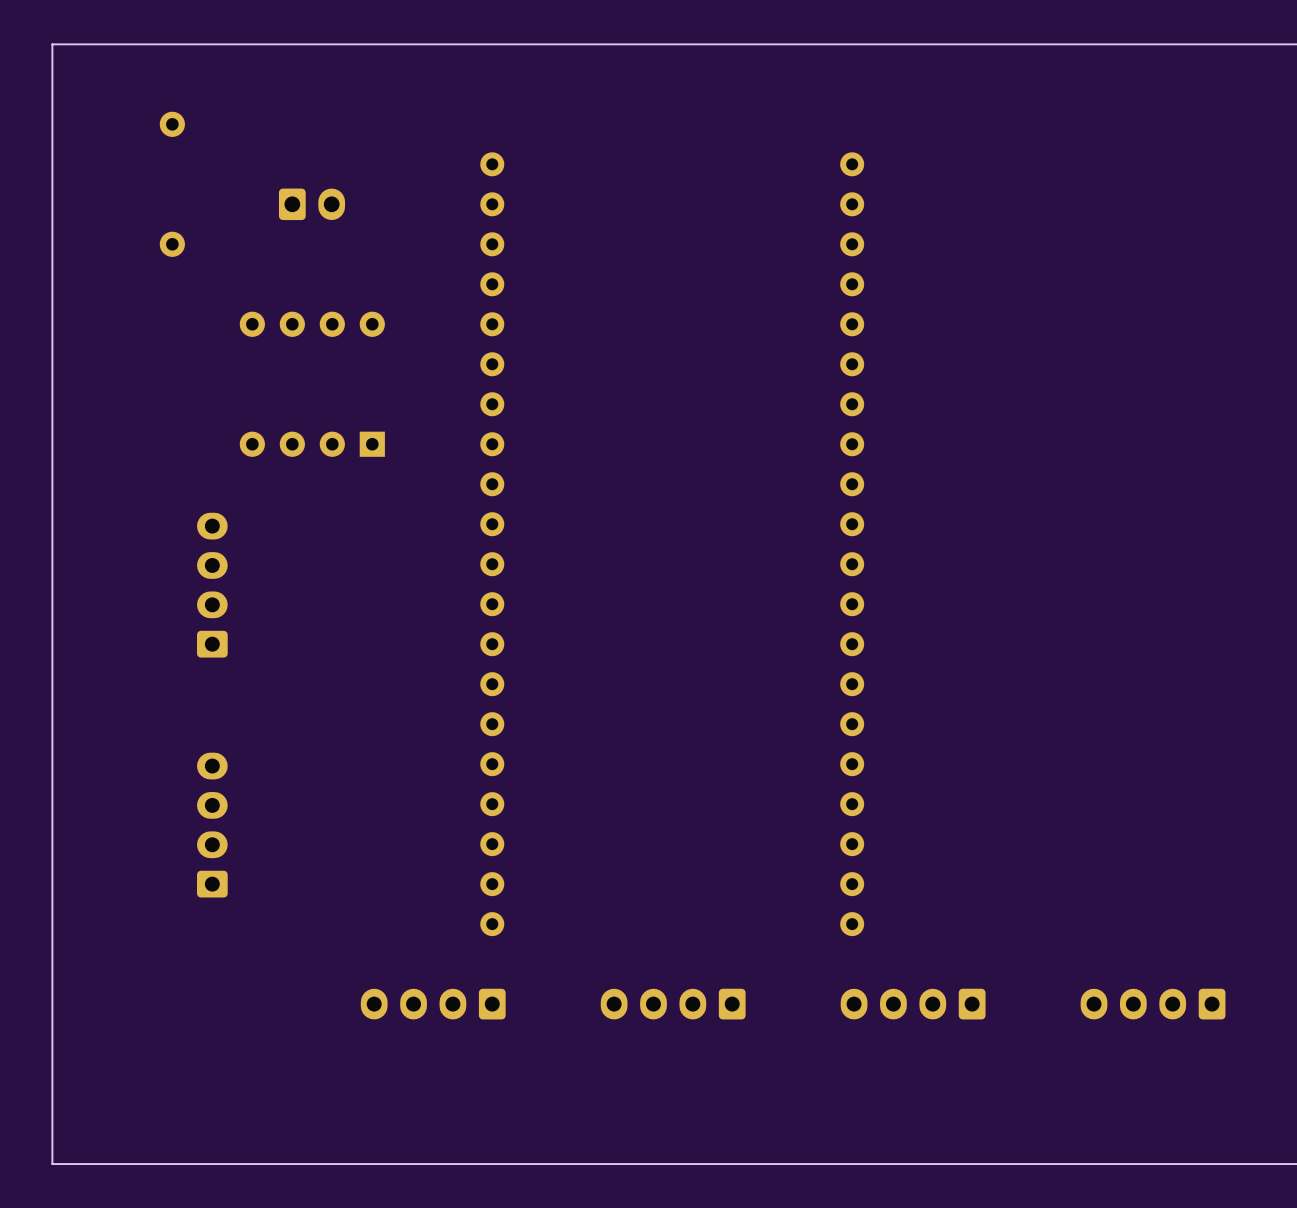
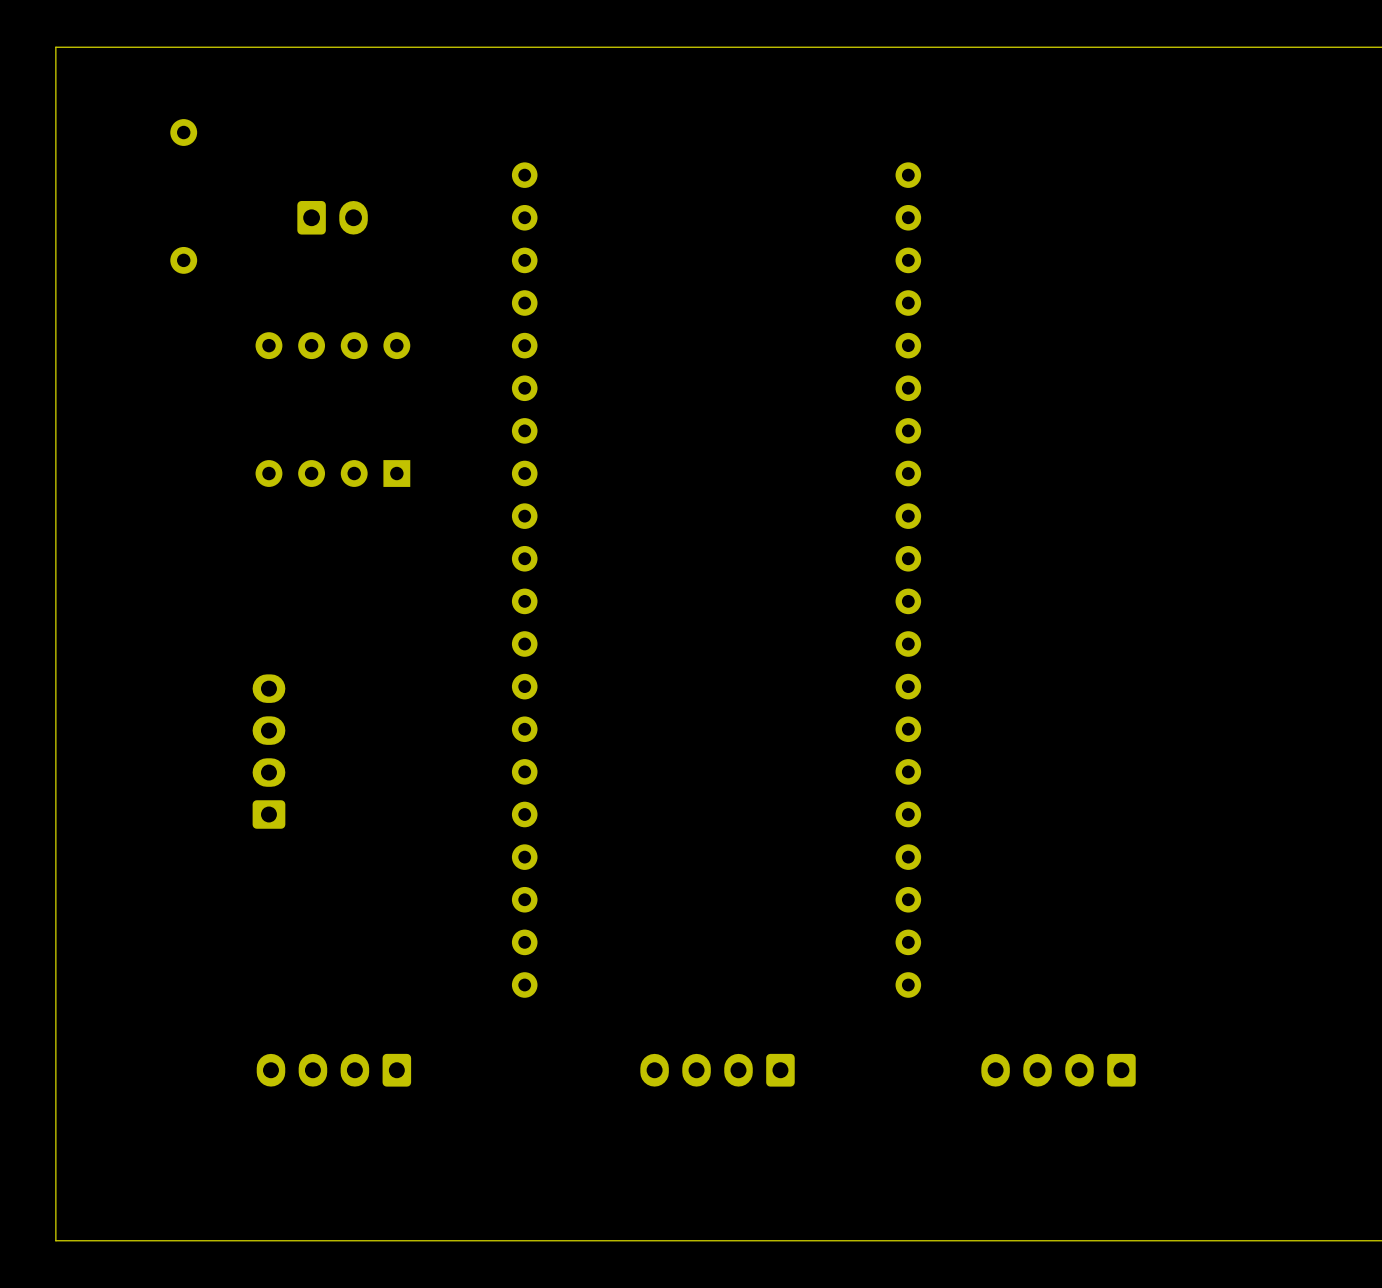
part: (212, 585) -> none
part: none -> (268, 751)
part: (212, 825) -> none
part: none -> (333, 1070)
part: (433, 1004) -> none
part: (913, 1004) -> none
part: none -> (1058, 1070)
part: (1153, 1004) -> none

